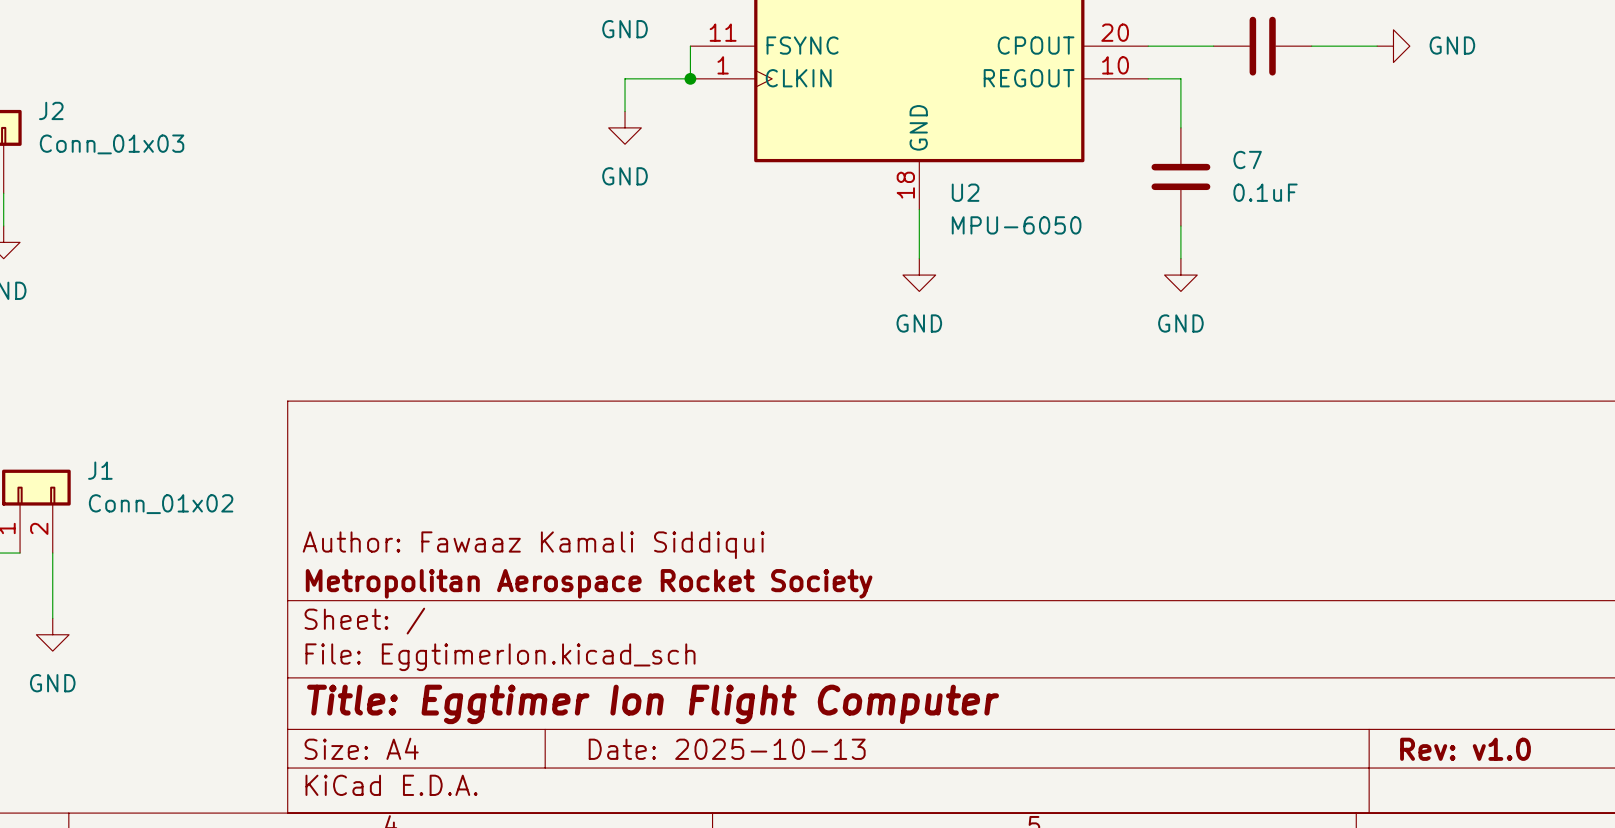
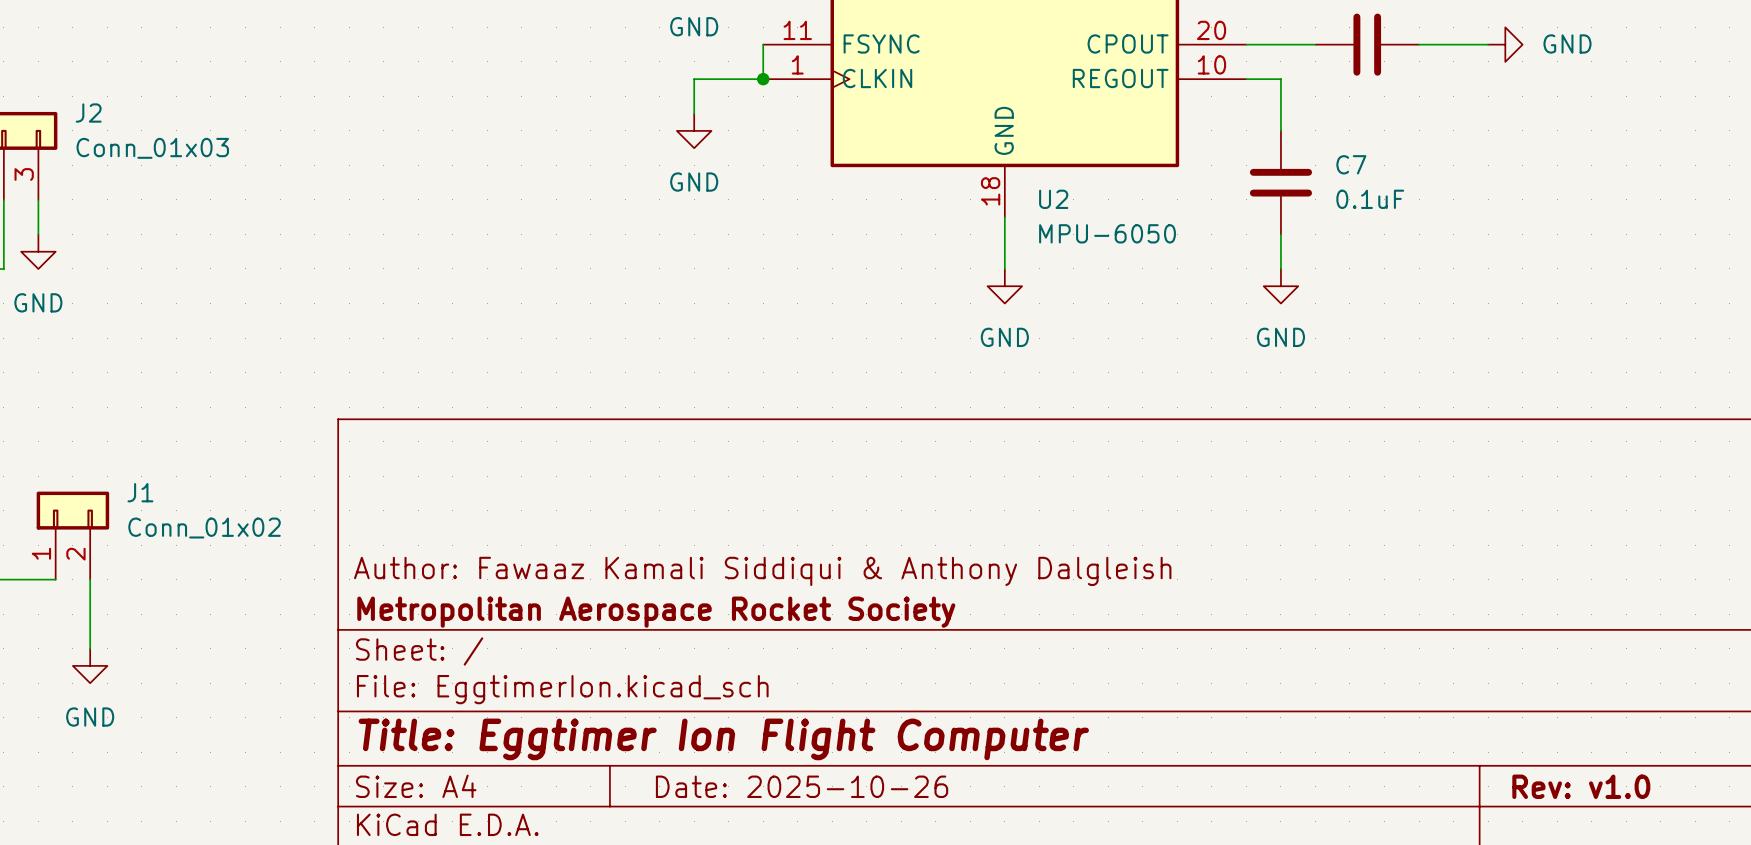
title block: Author: Fawaaz Kamali Siddiqui (533, 545) -> Author: Fawaaz Kamali Siddiqui & Anthony Dalgleish (762, 571)
title block: Date: 2025-10-13 (727, 749) -> Date: 2025-10-26 (802, 786)

